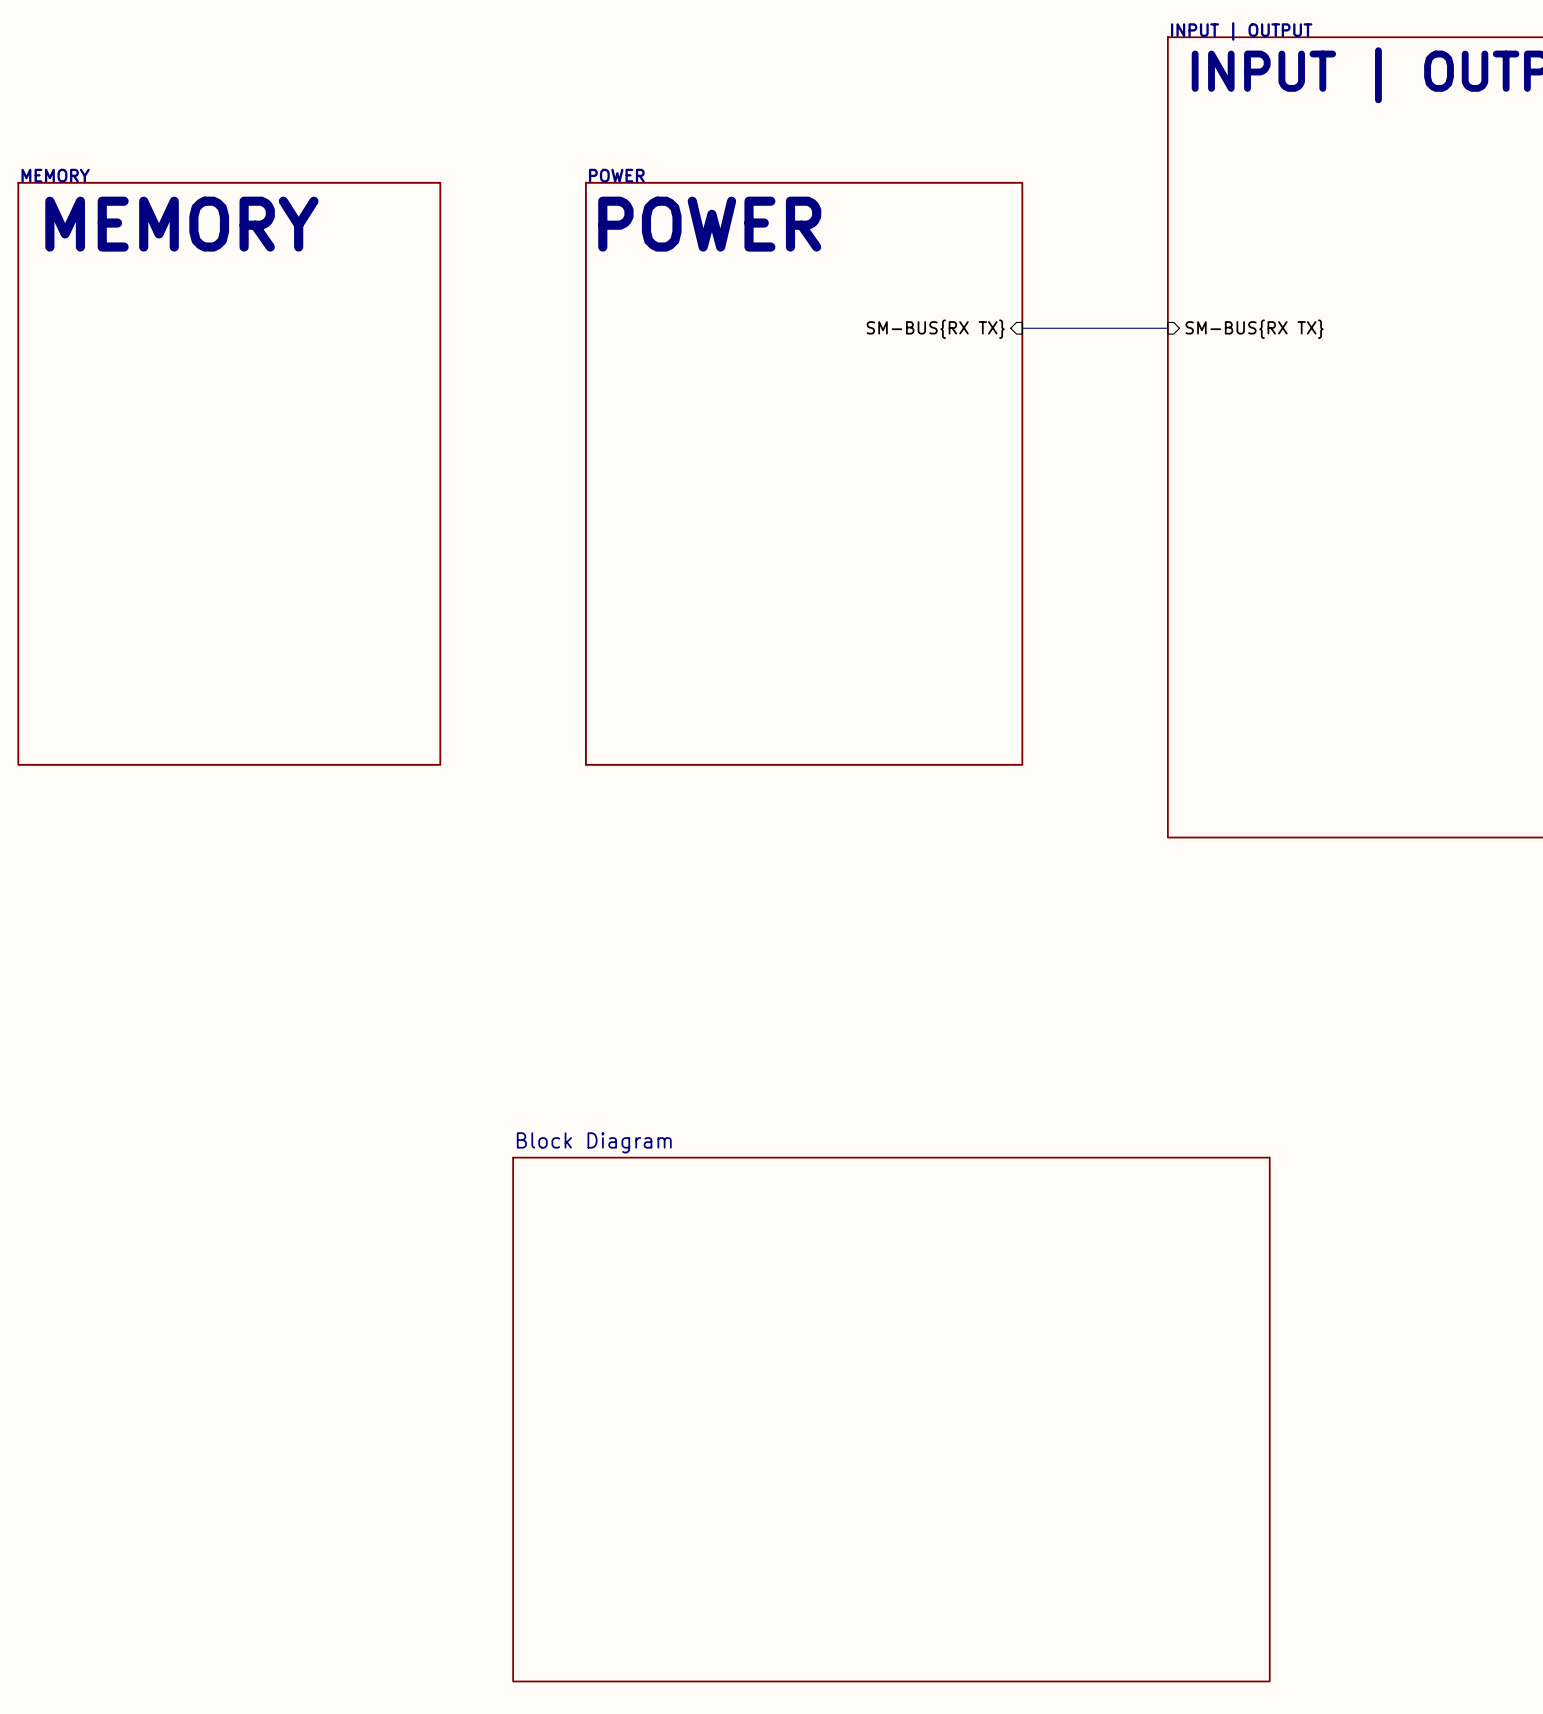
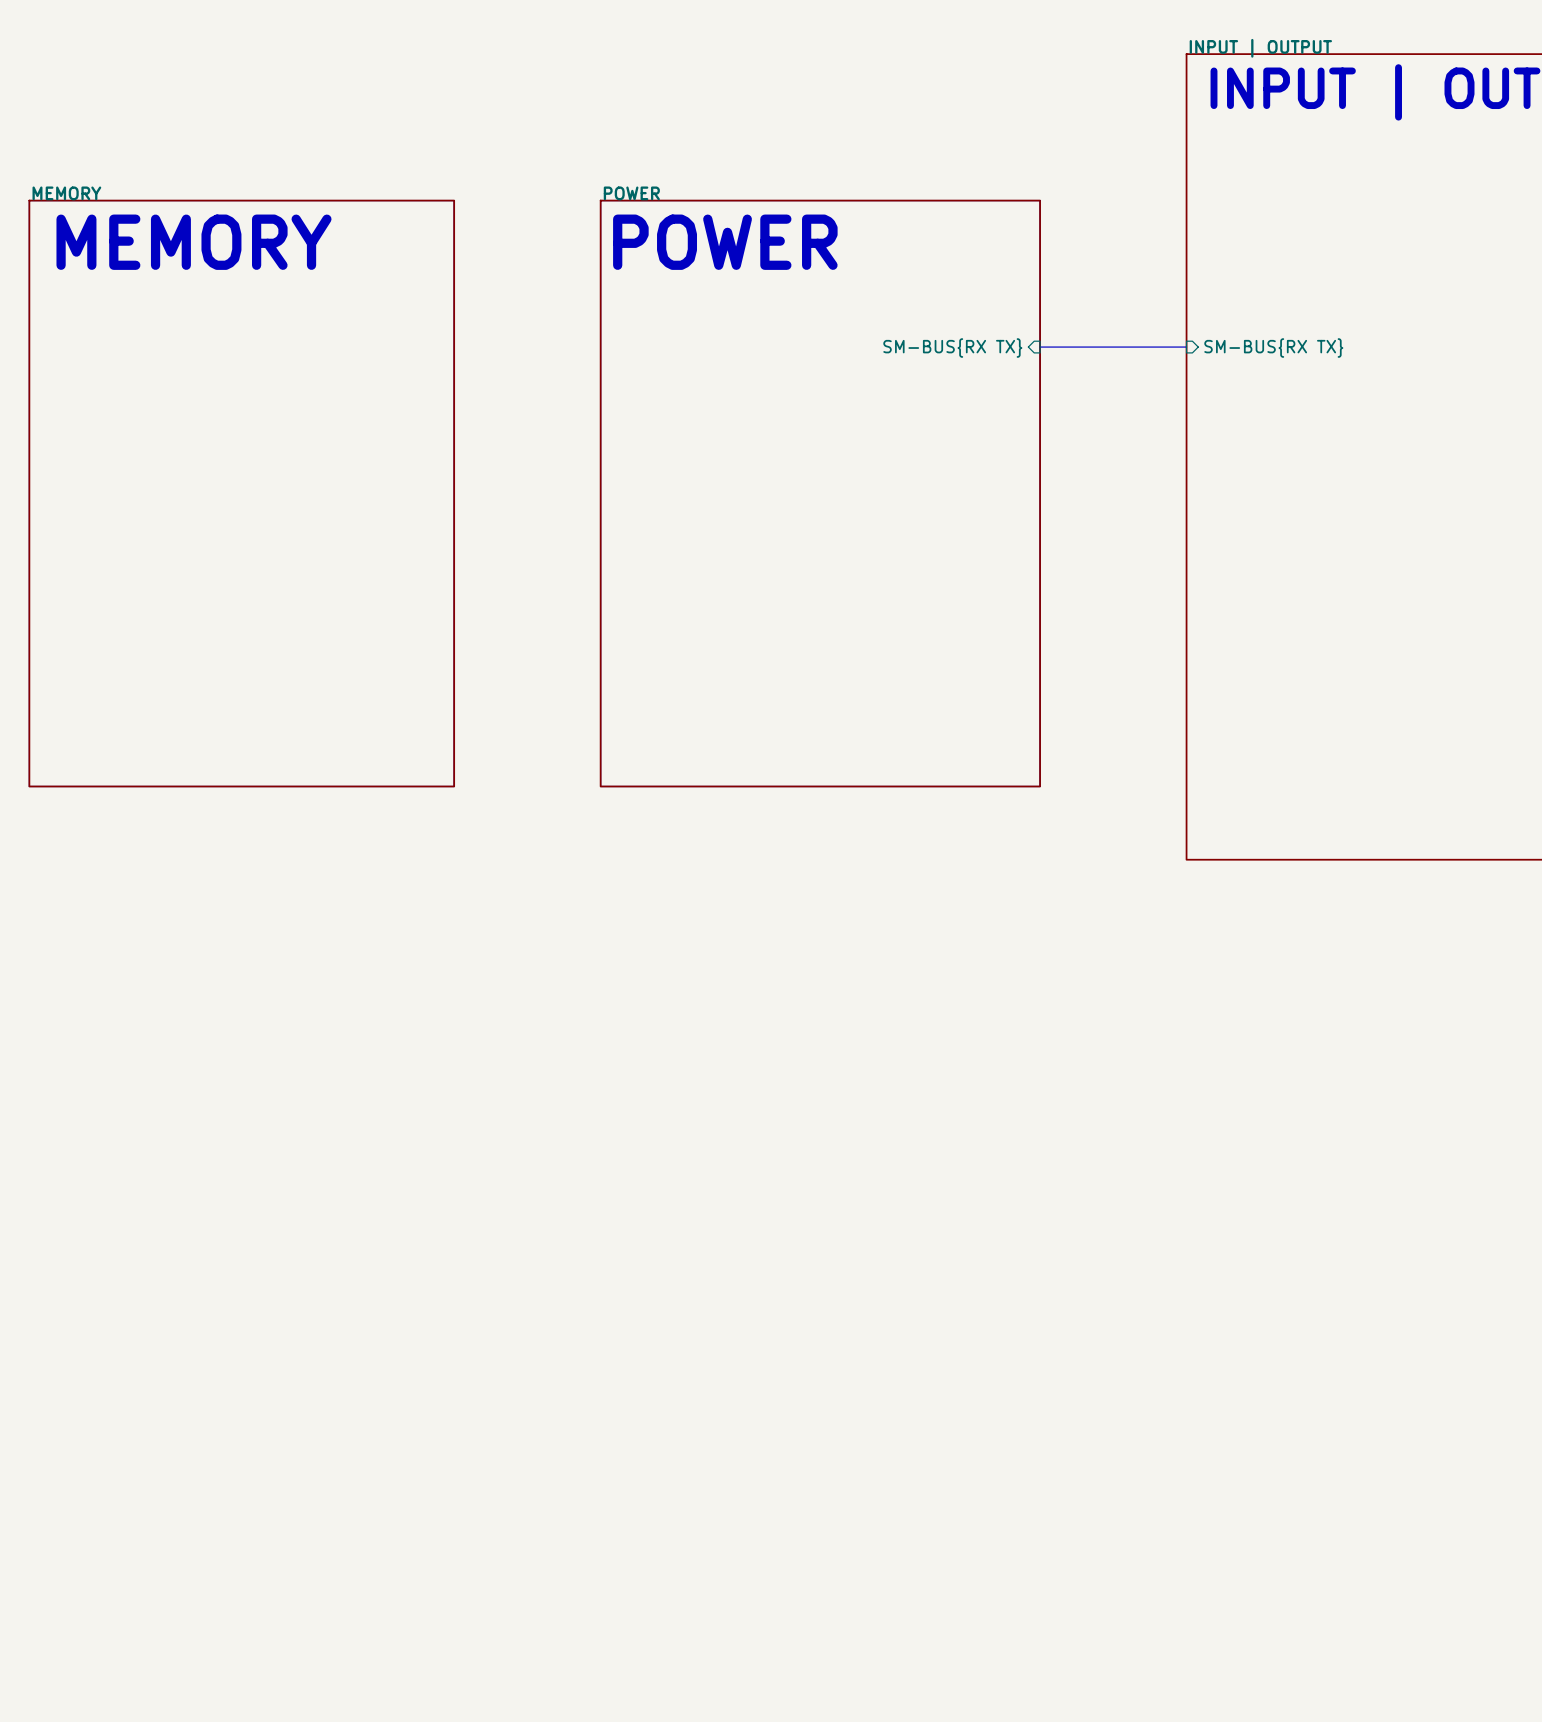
sheet Block Diagram: (891, 1419) -> none

